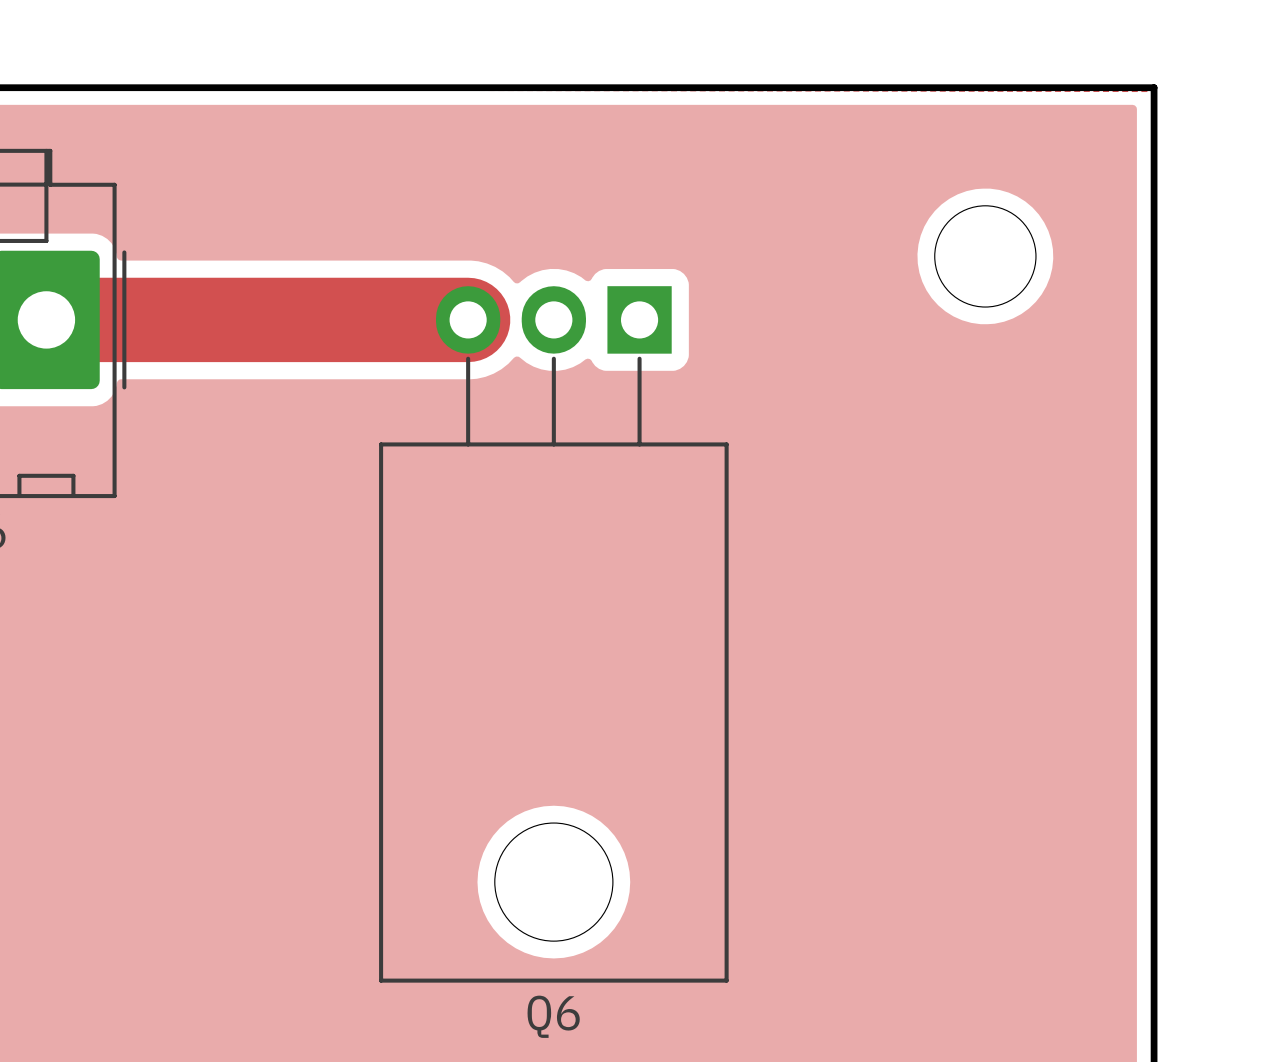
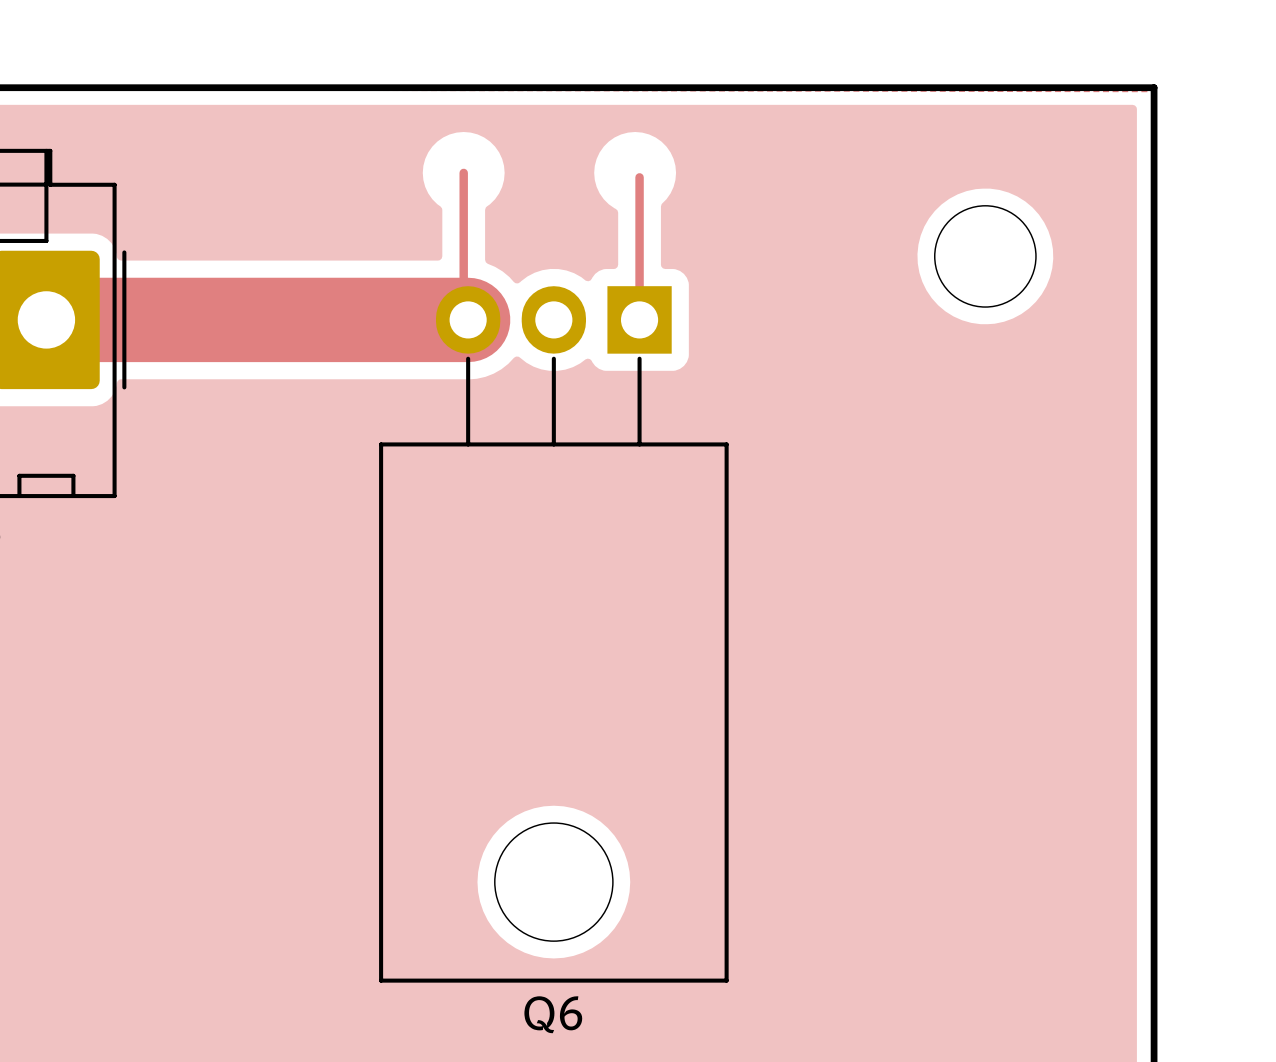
track: none -> (463, 172) (463, 315)
track: none -> (639, 177) (639, 319)

